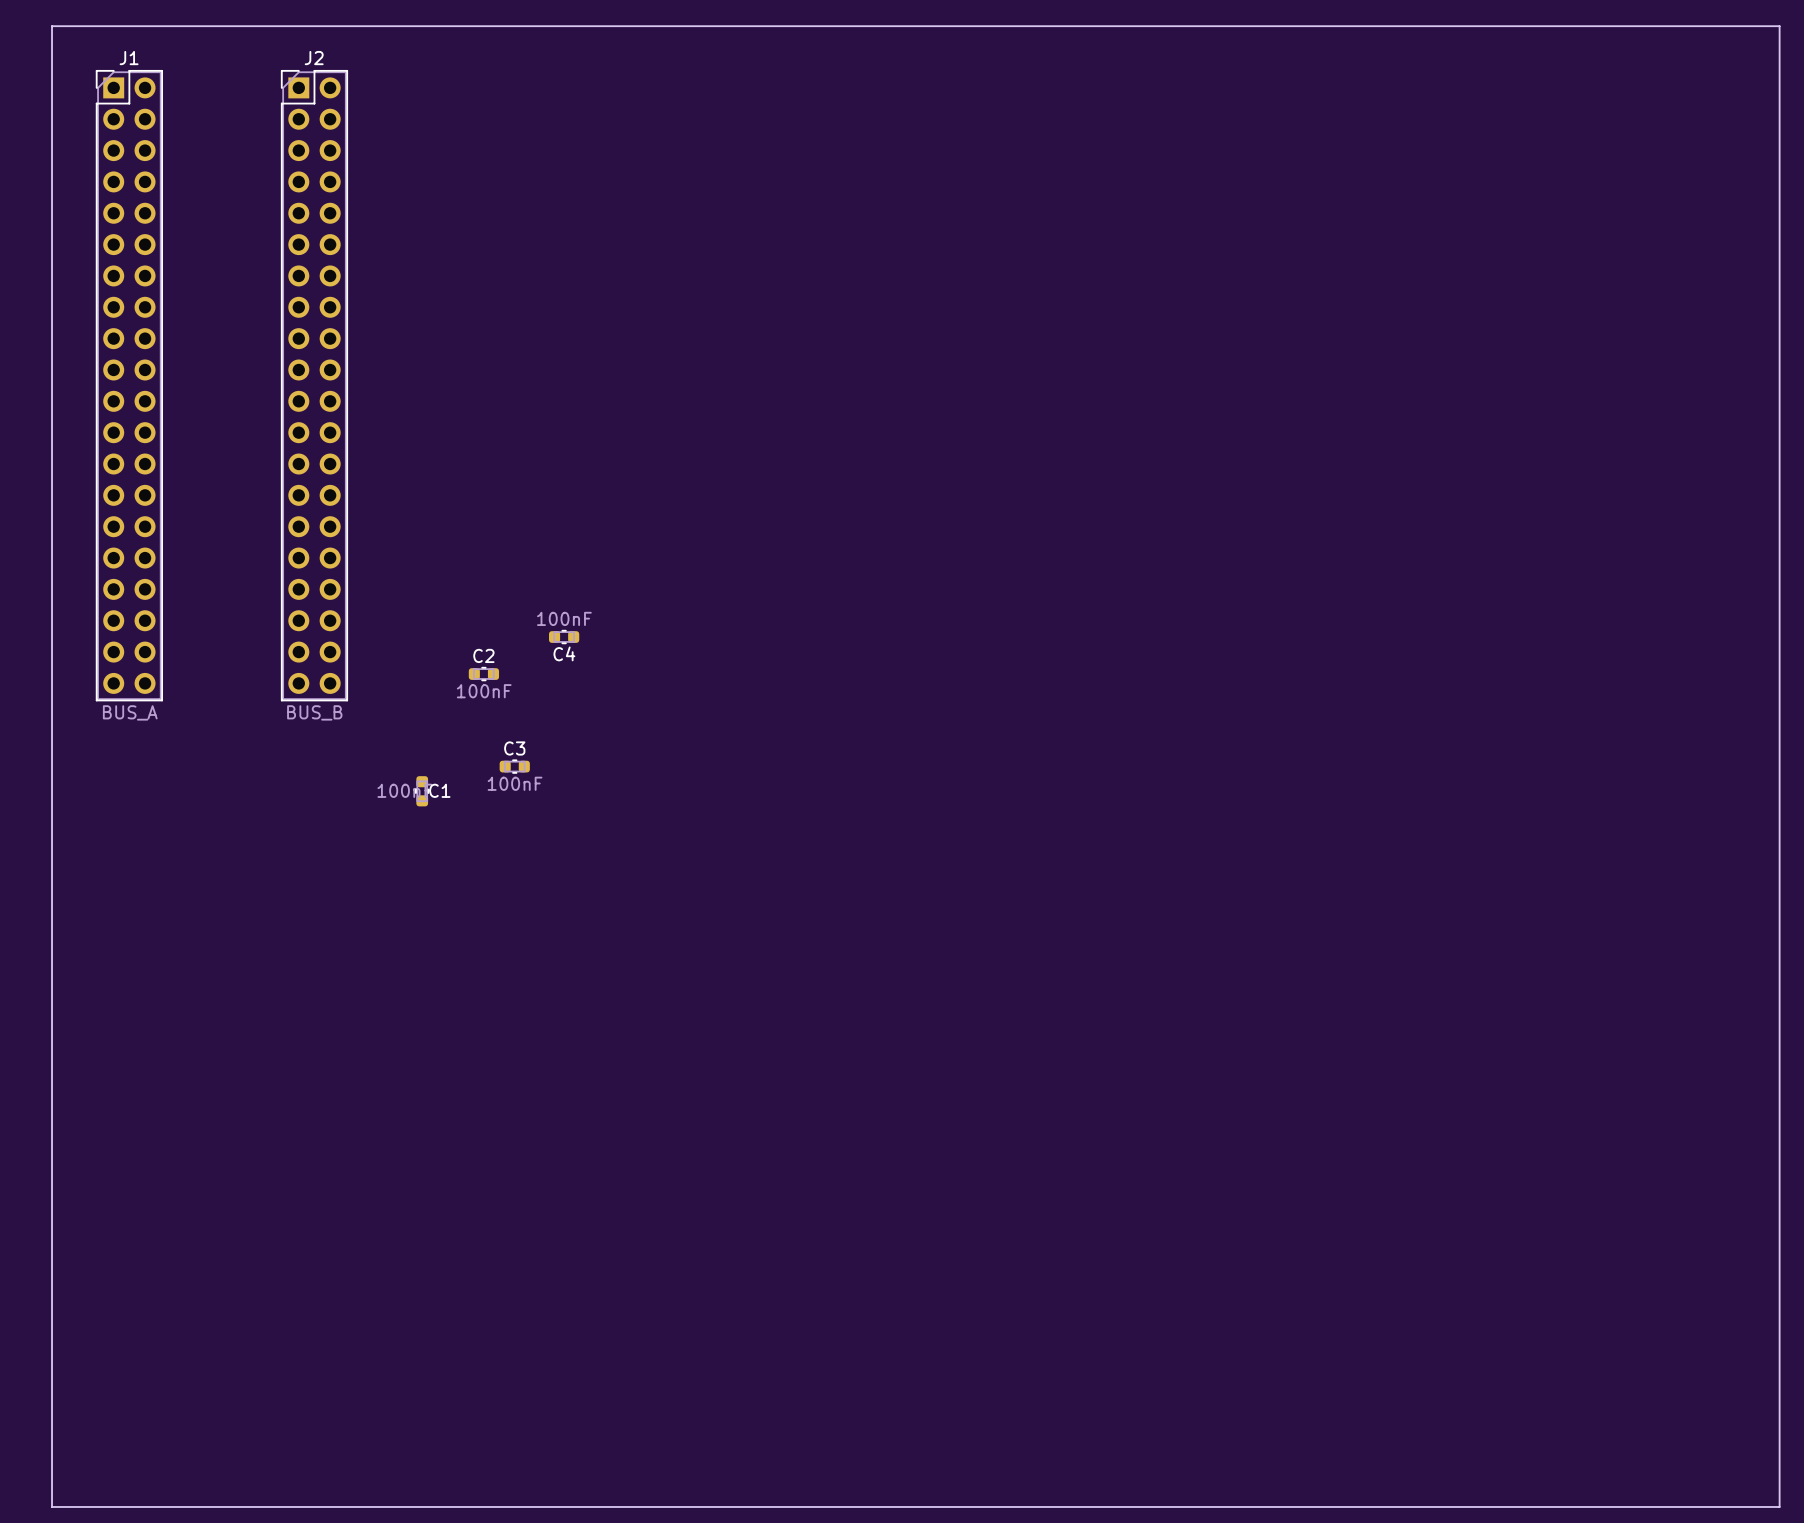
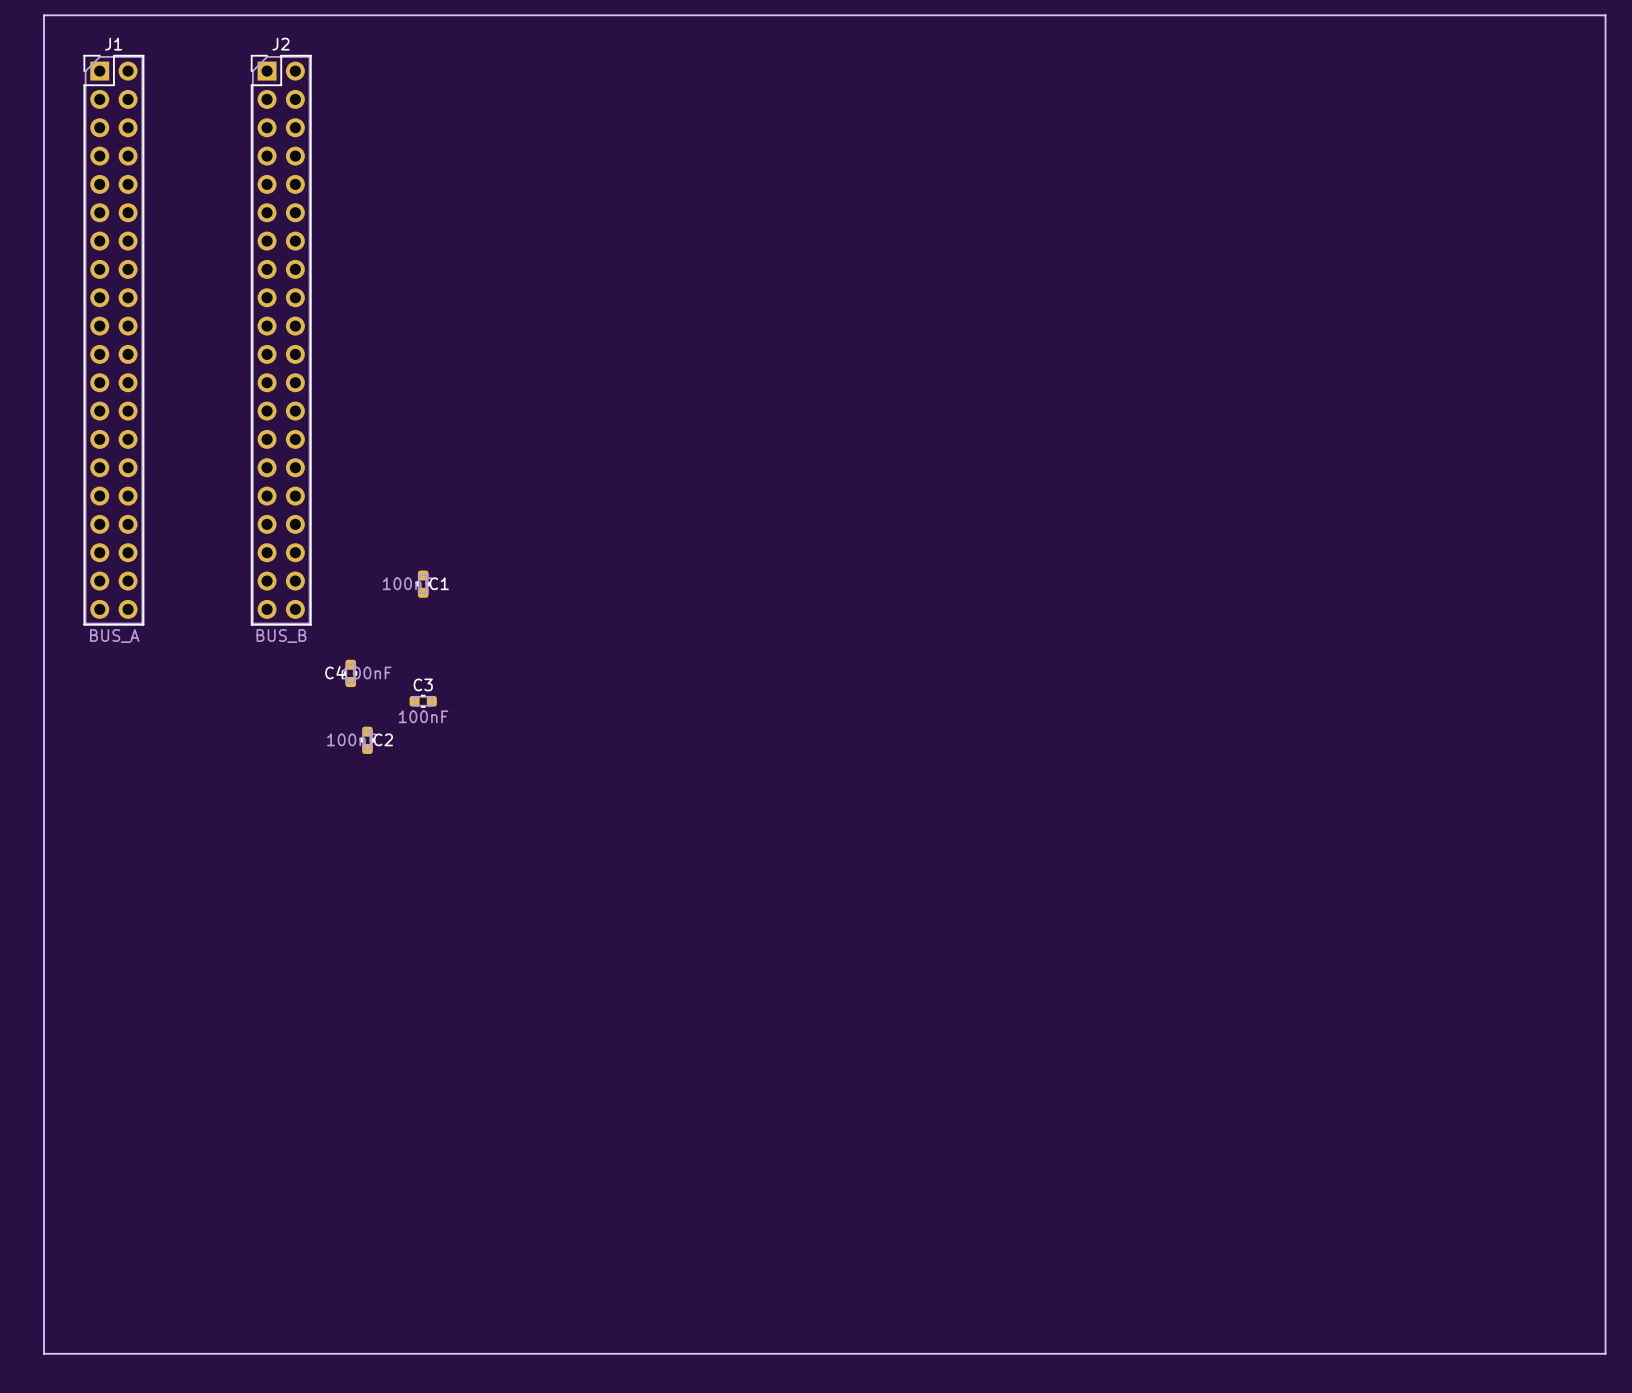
C4 rotation: 0° (564, 637) -> 90° clockwise (350, 673)
C4 position: (564, 637) -> (350, 673)
C2 rotation: 0° (483, 674) -> 90° clockwise (367, 740)
C2 position: (483, 674) -> (367, 740)
C3 position: (514, 766) -> (423, 701)
C1 position: (422, 791) -> (423, 584)

